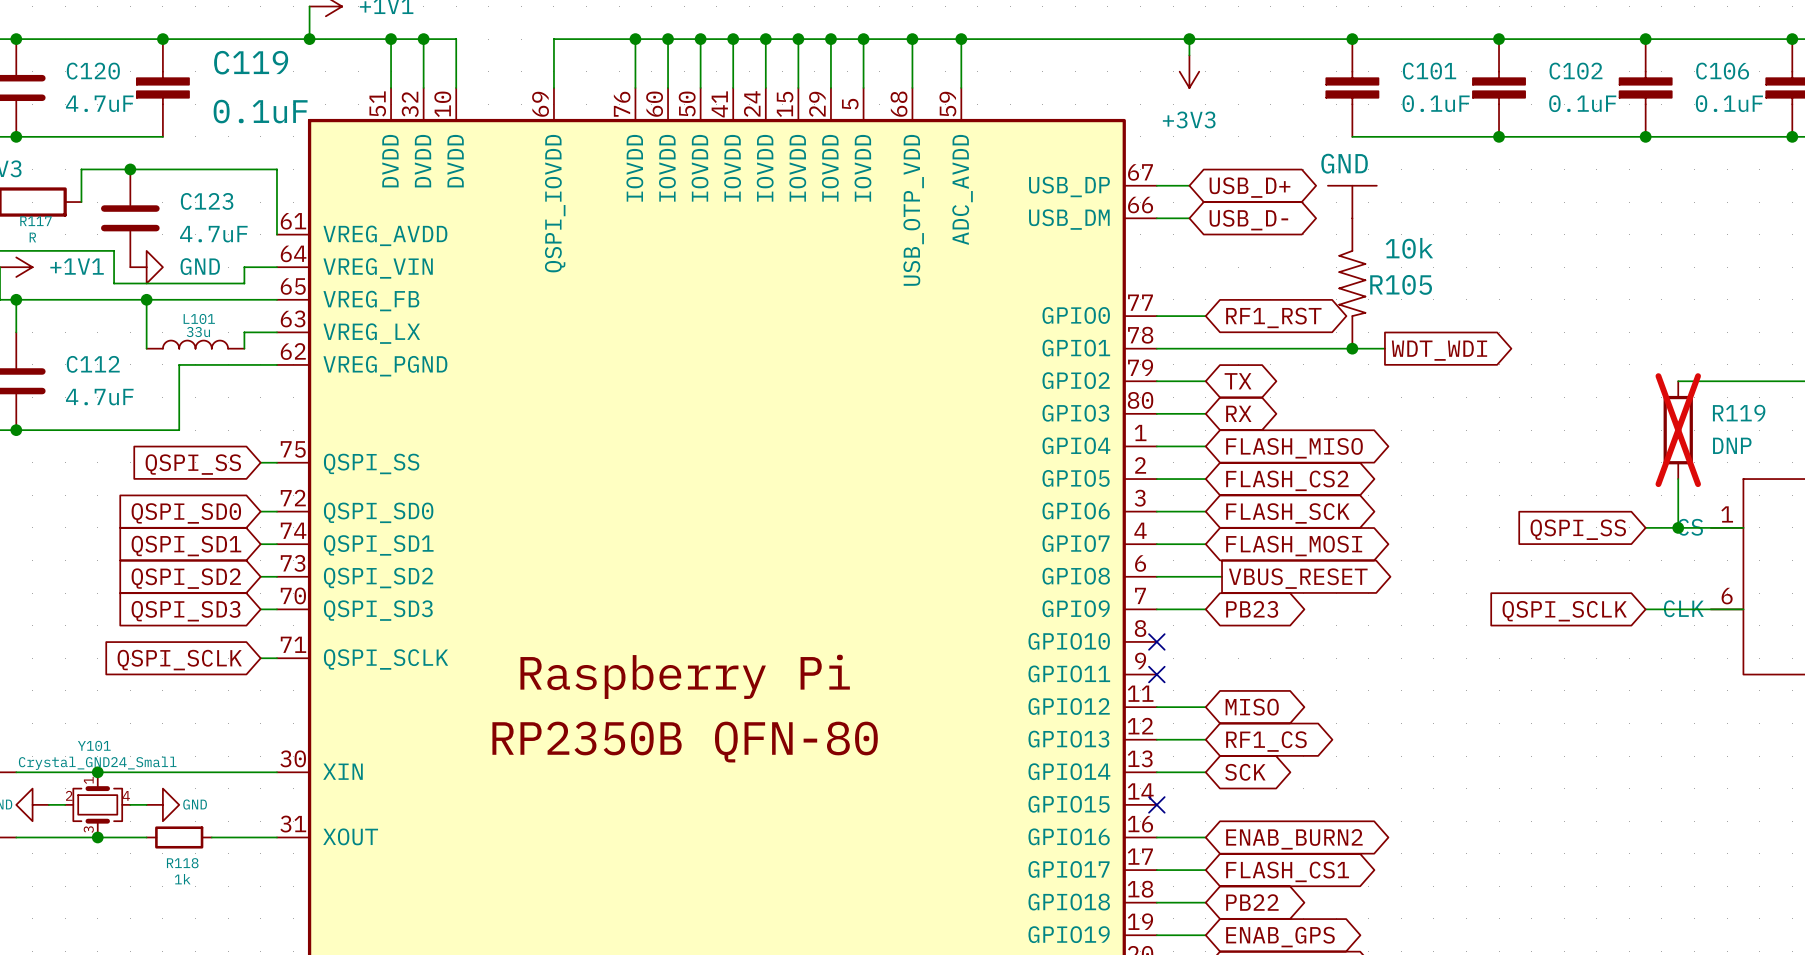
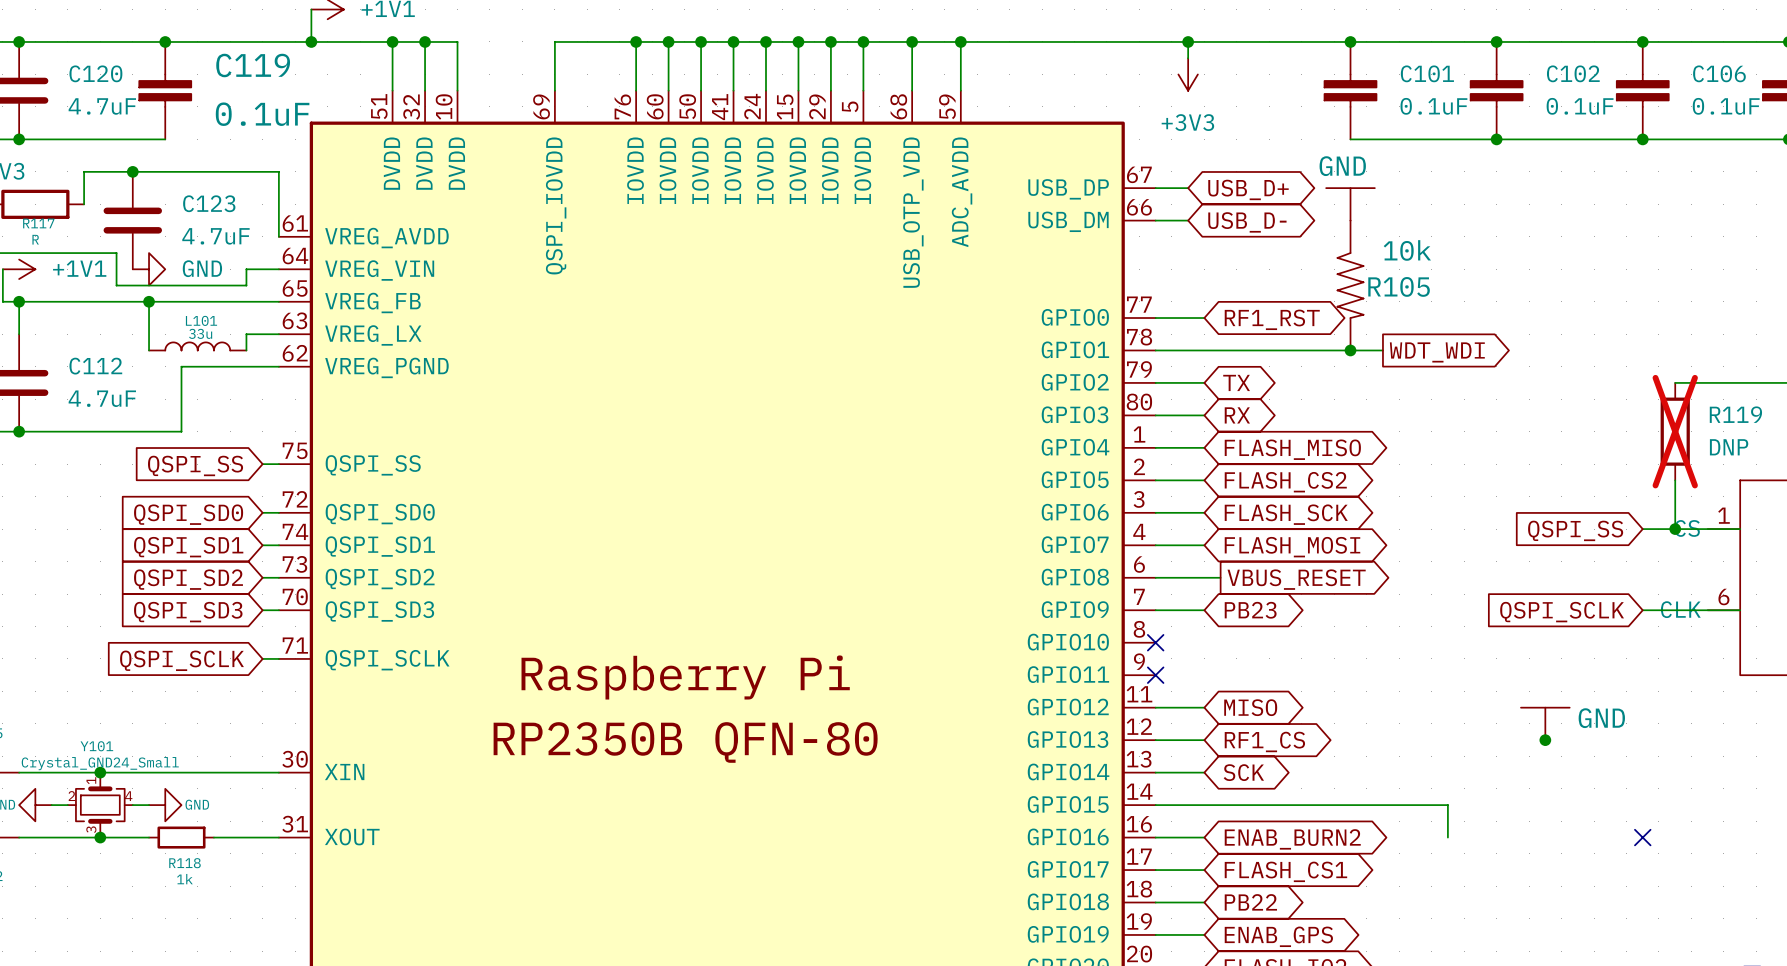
power symbol: none -> GND (1545, 723)
junction: none -> (1545, 740)
wire: none -> (1155, 805) (1447, 805) (1447, 837)
no-connect mark: (1156, 804) -> none
no-connect mark: none -> (1642, 837)

